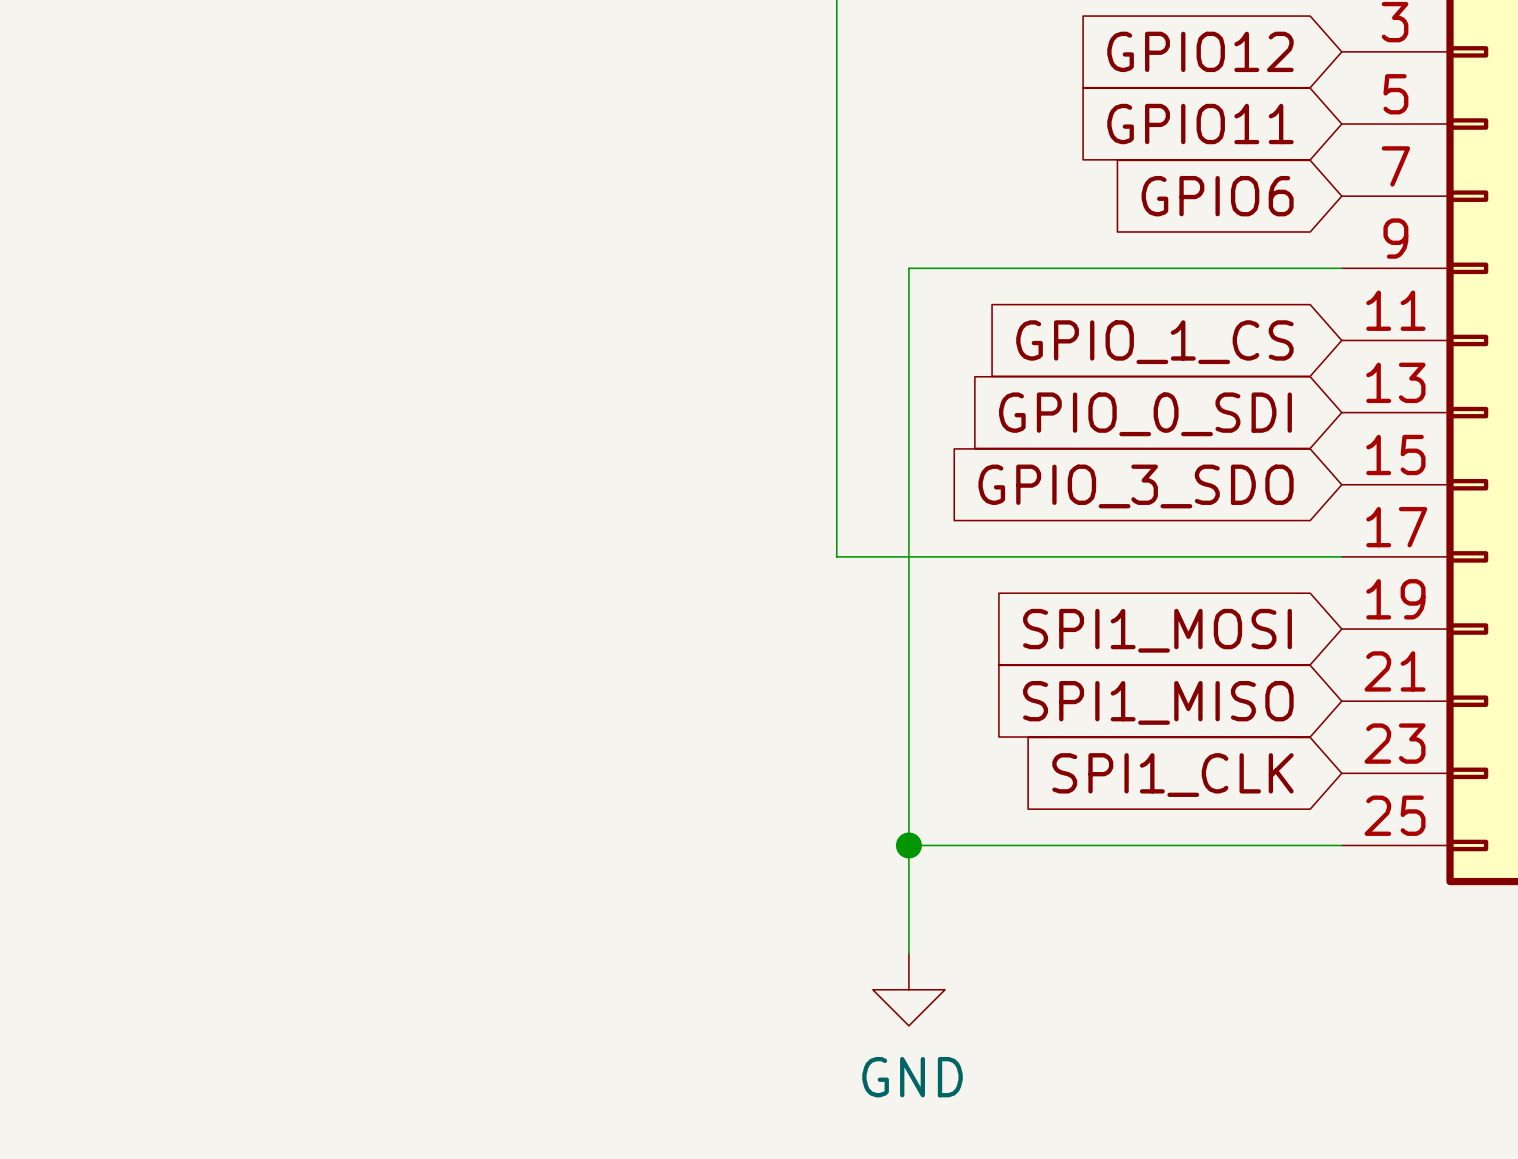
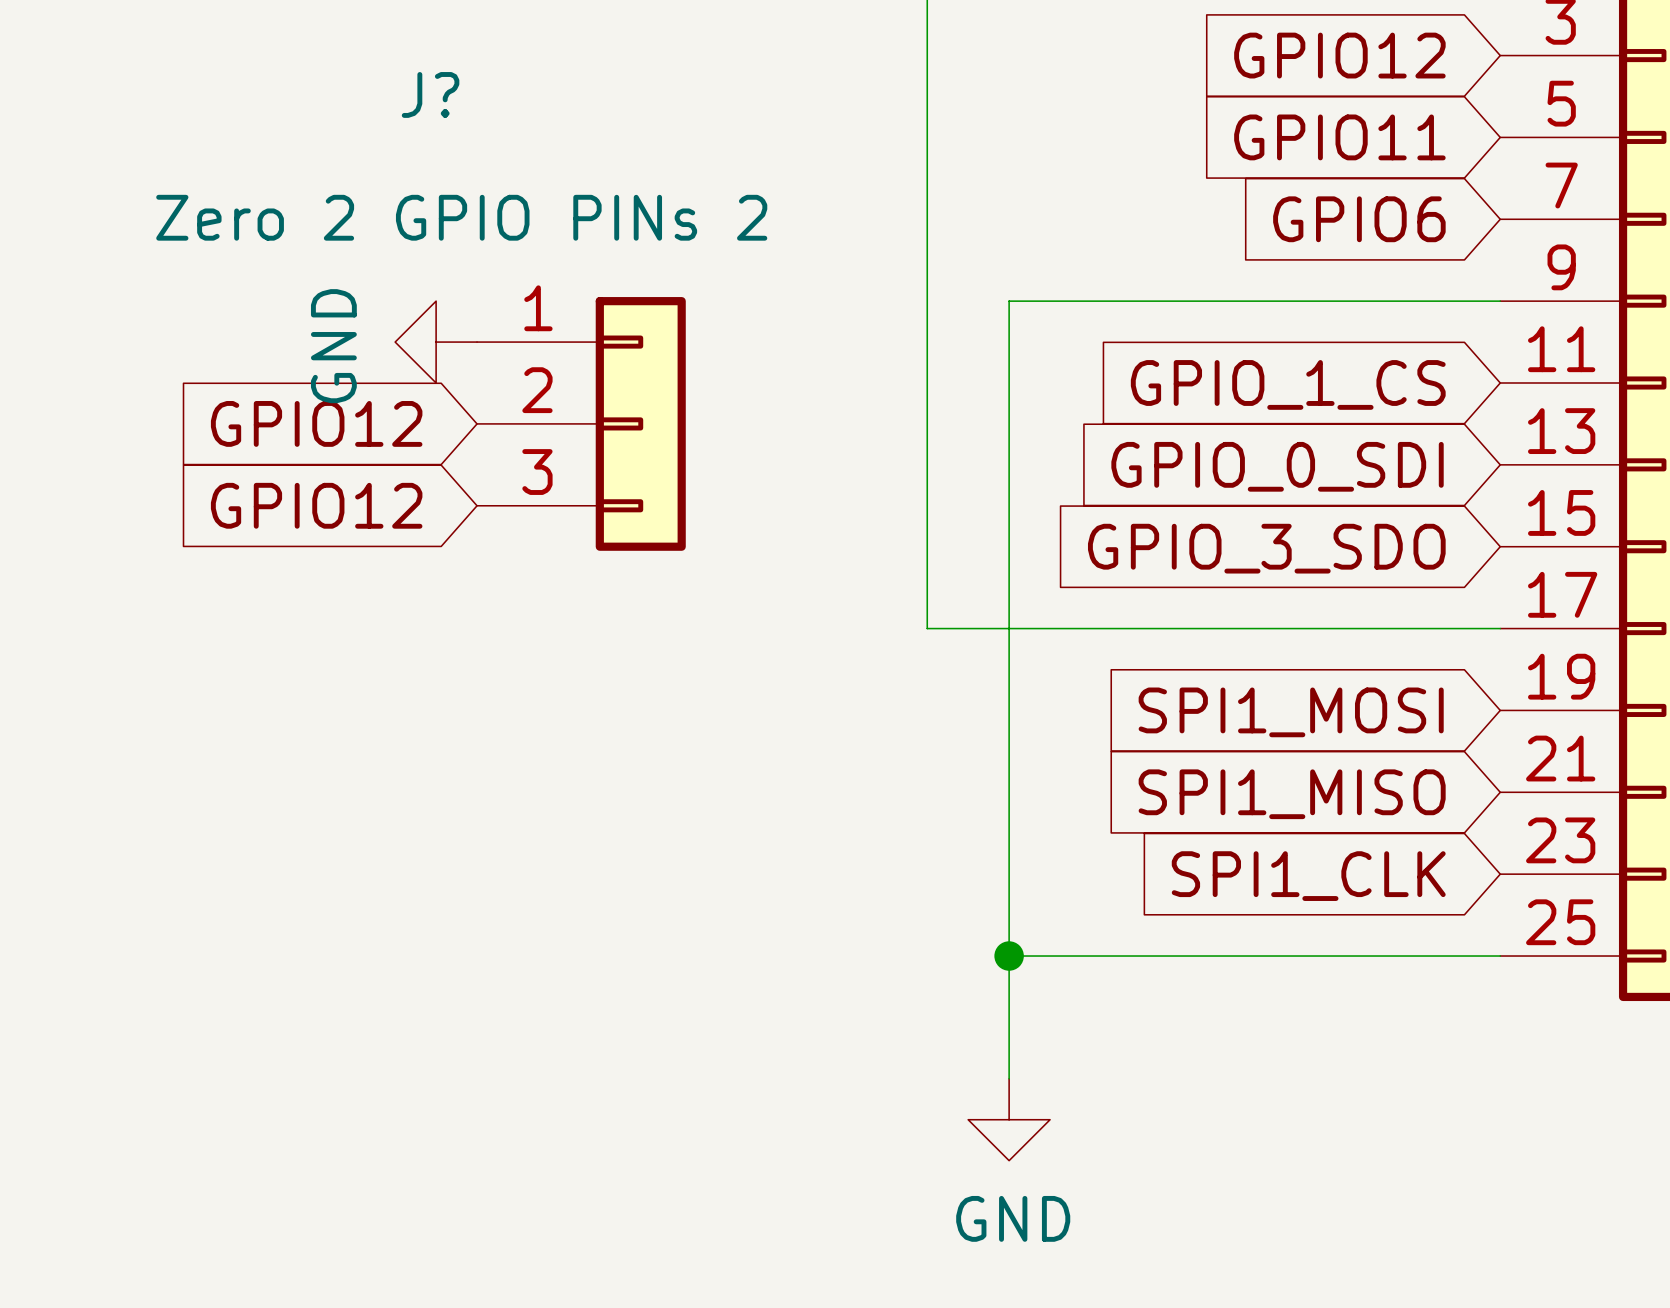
power symbol: none -> GND (436, 342)
global label: none -> GPIO12 (316, 423)
J?: none -> Zero 2 GPIO PINs 2 (581, 423)
global label: none -> GPIO12 (316, 505)

